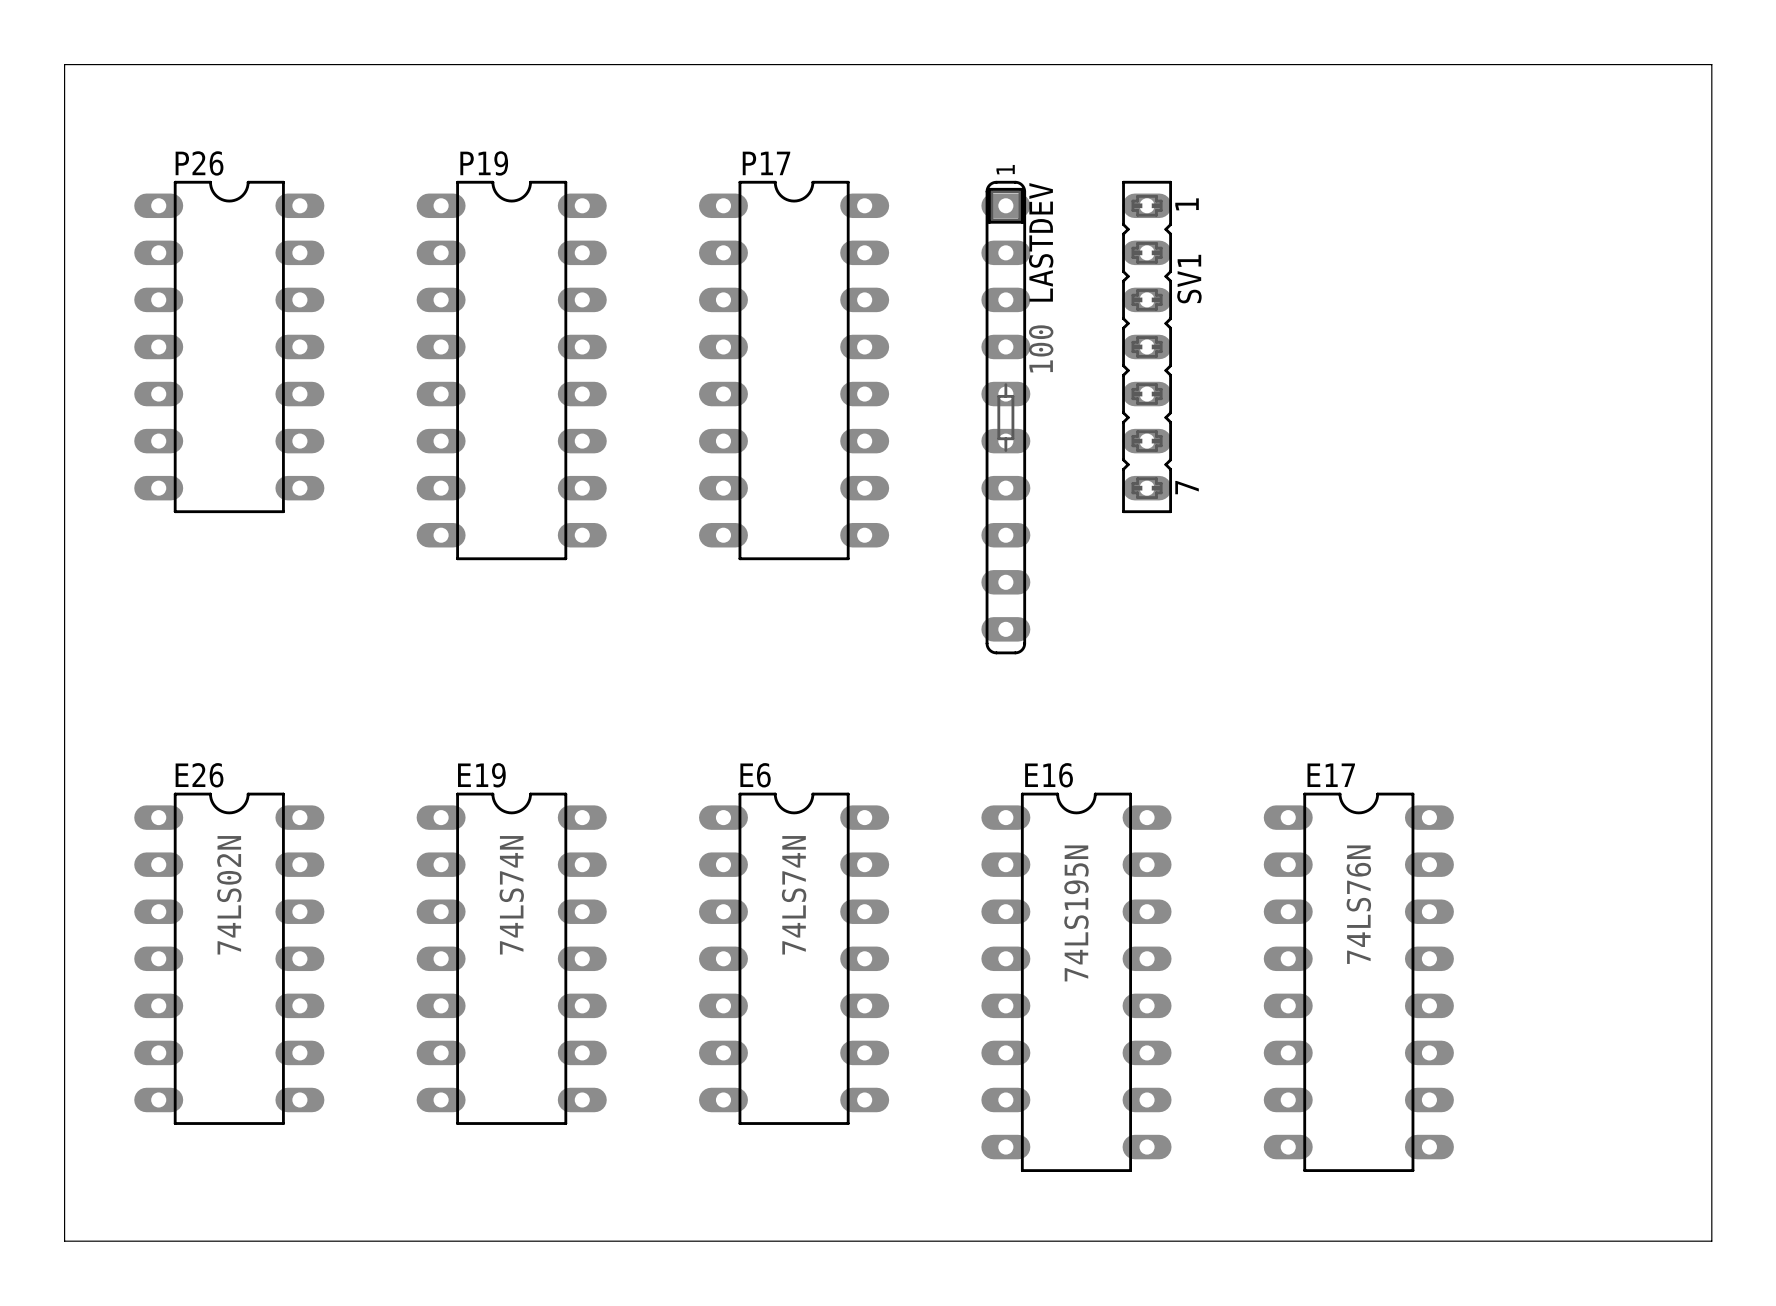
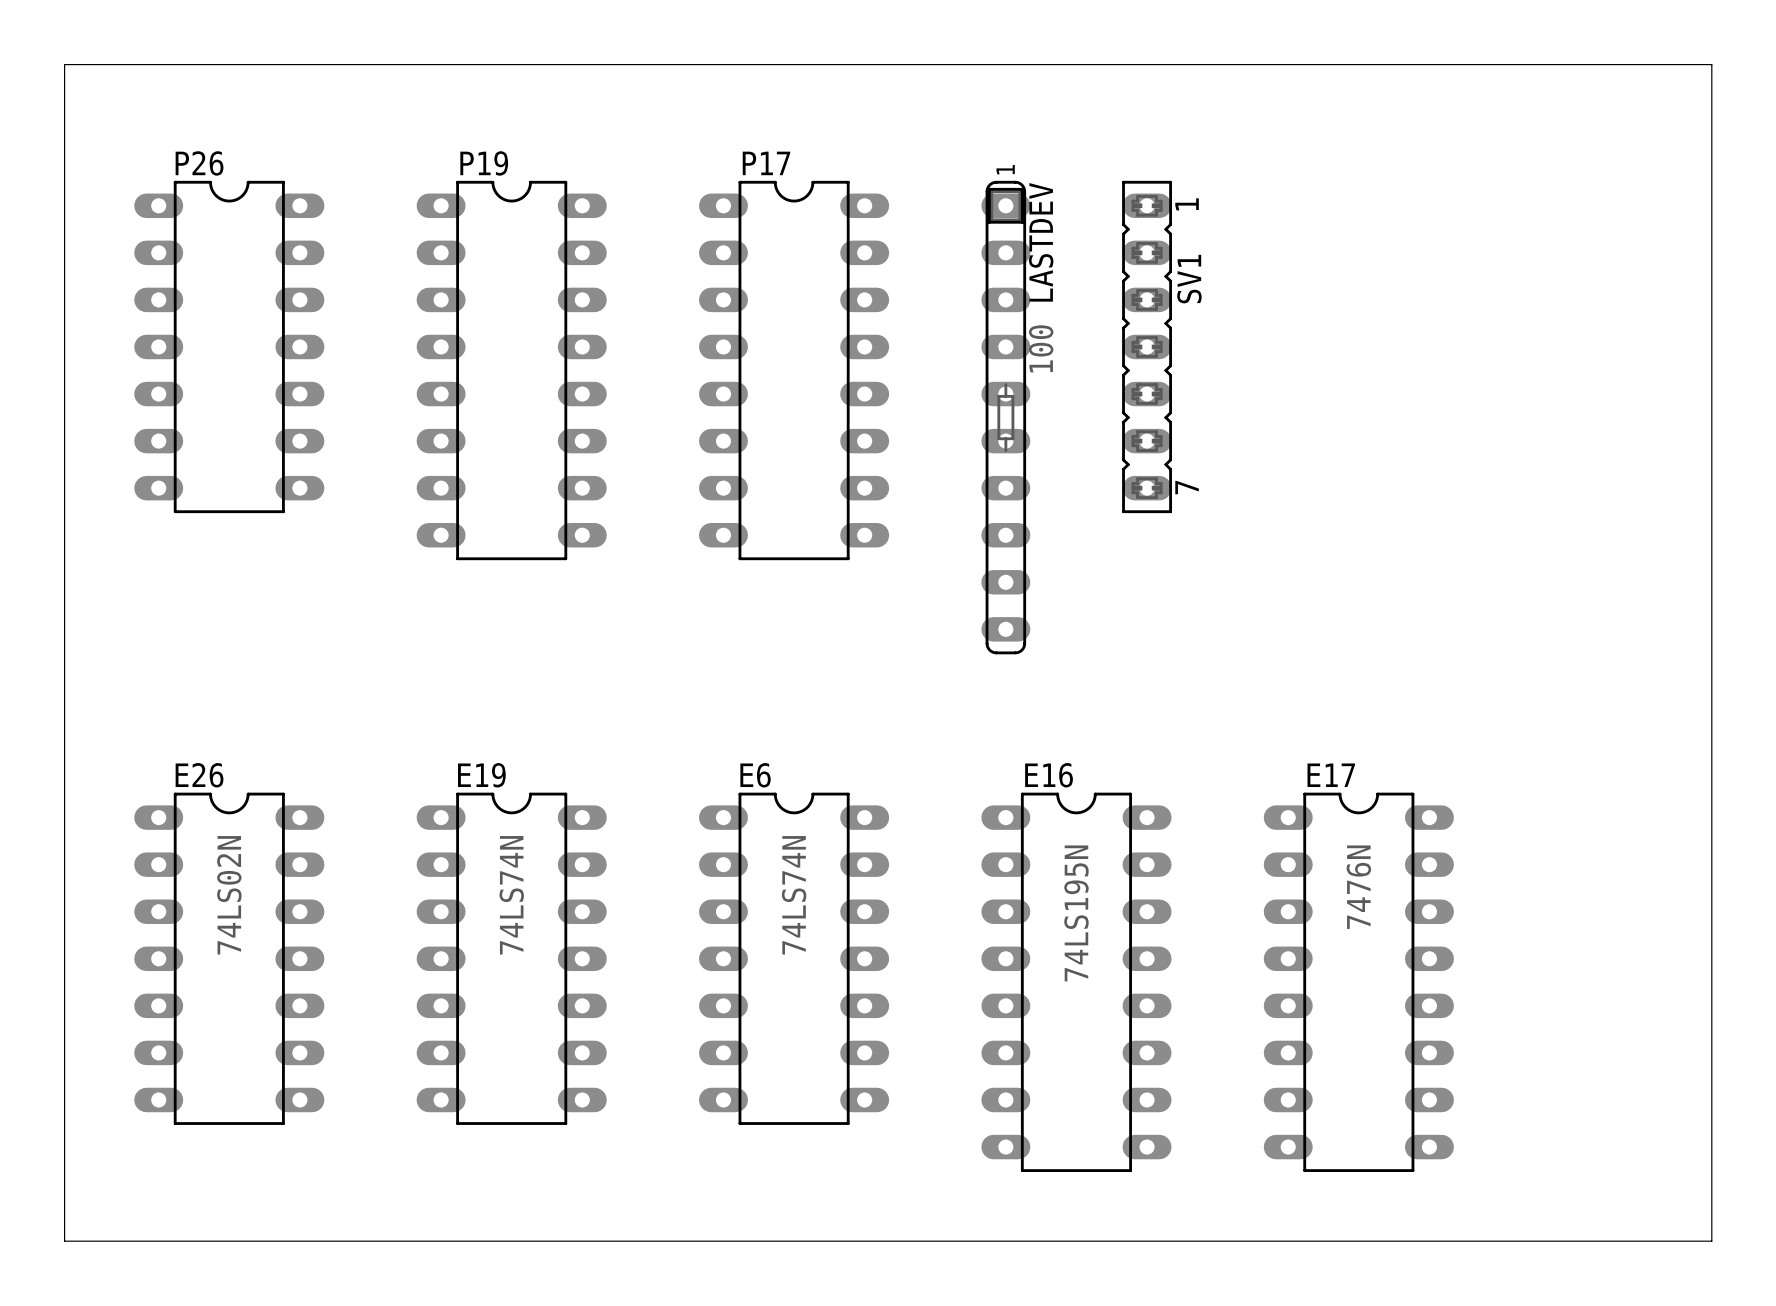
E17 value: 74LS76N (1358, 904) -> 7476N (1358, 887)

